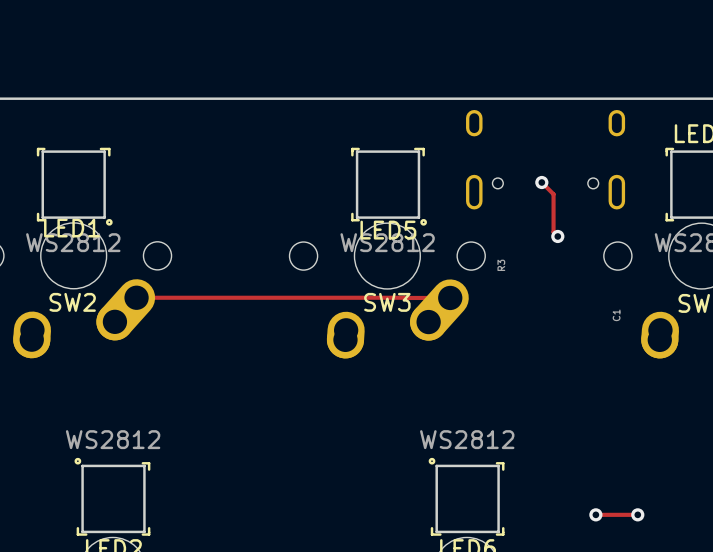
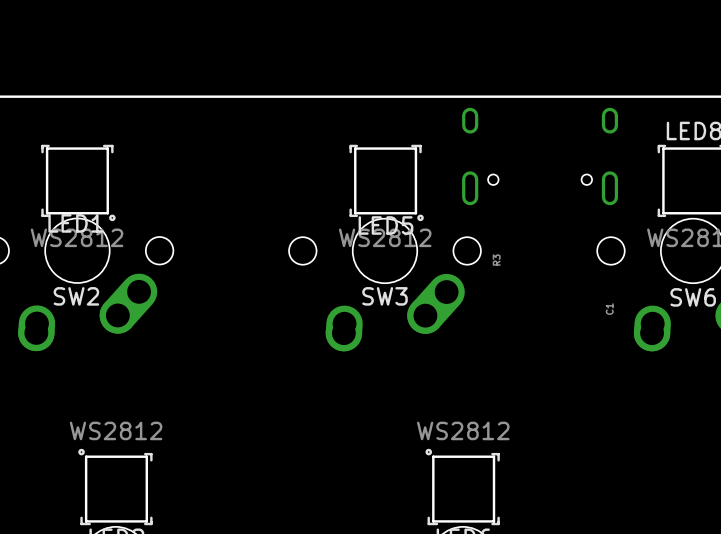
track: (541, 182) (553, 194) (553, 232) (557, 236) -> none
via: (541, 182) -> none
via: (557, 236) -> none
track: (136, 297) (404, 297) -> none
track: (404, 297) (450, 297) -> none
track: (595, 514) (637, 514) -> none
via: (595, 514) -> none
via: (637, 514) -> none

